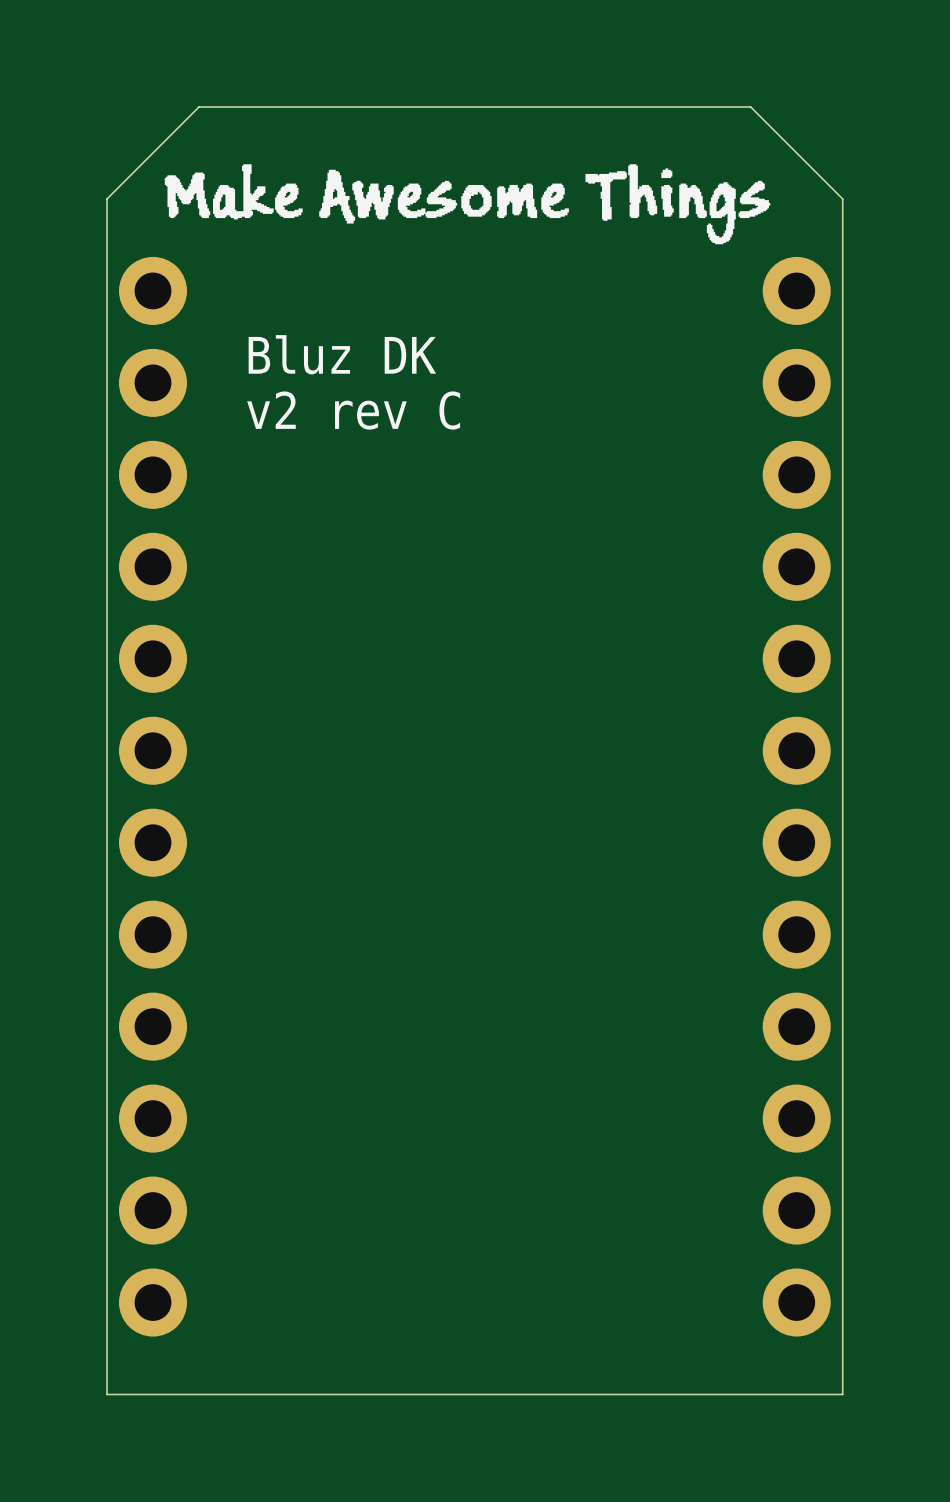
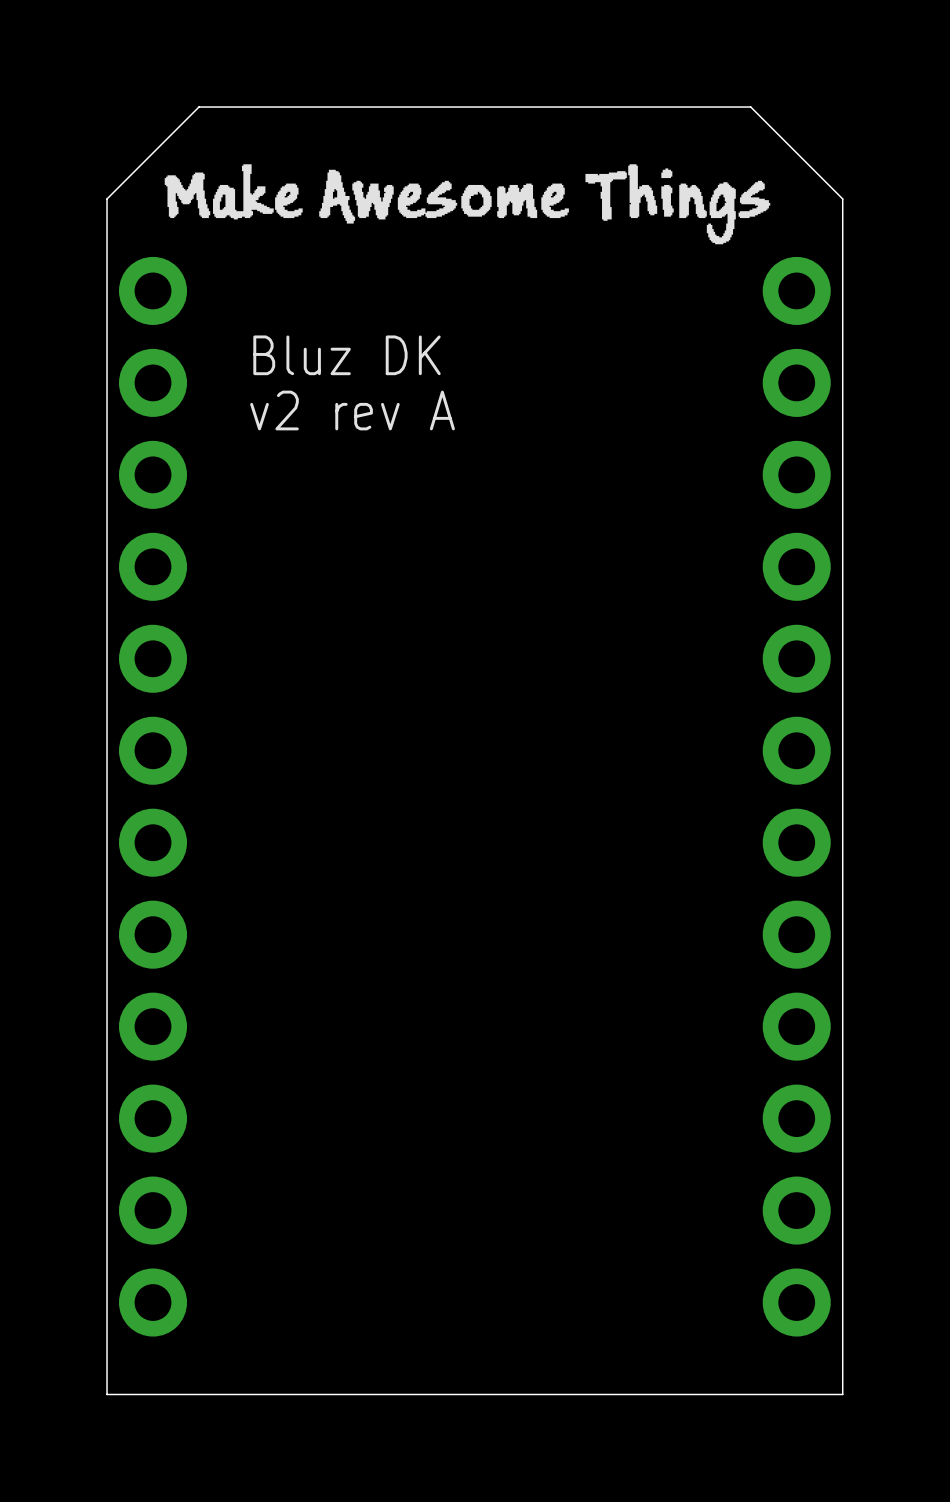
text: v2 rev C (353, 410) -> v2 rev A (352, 410)

